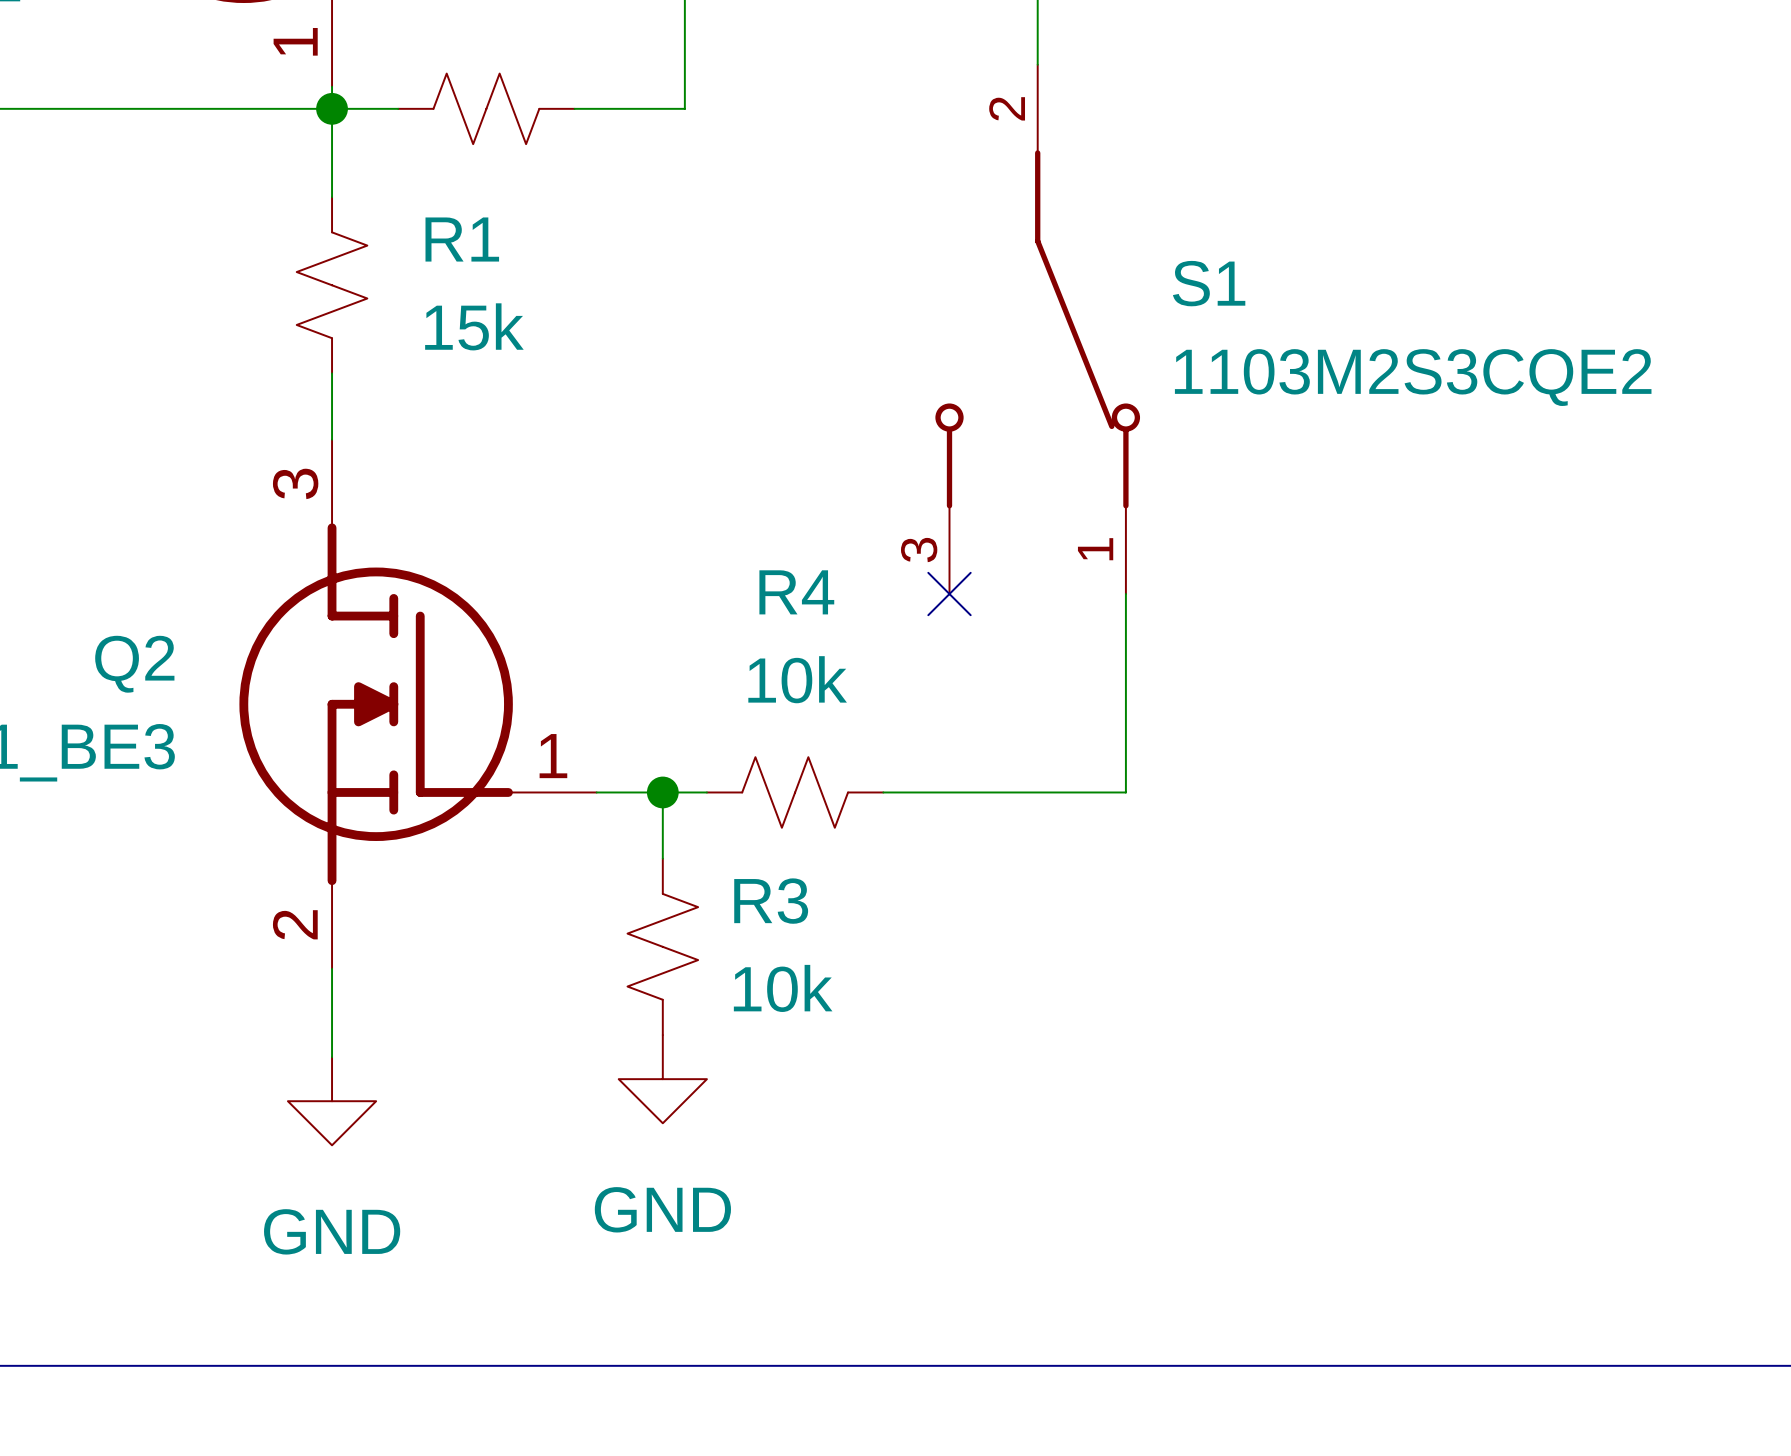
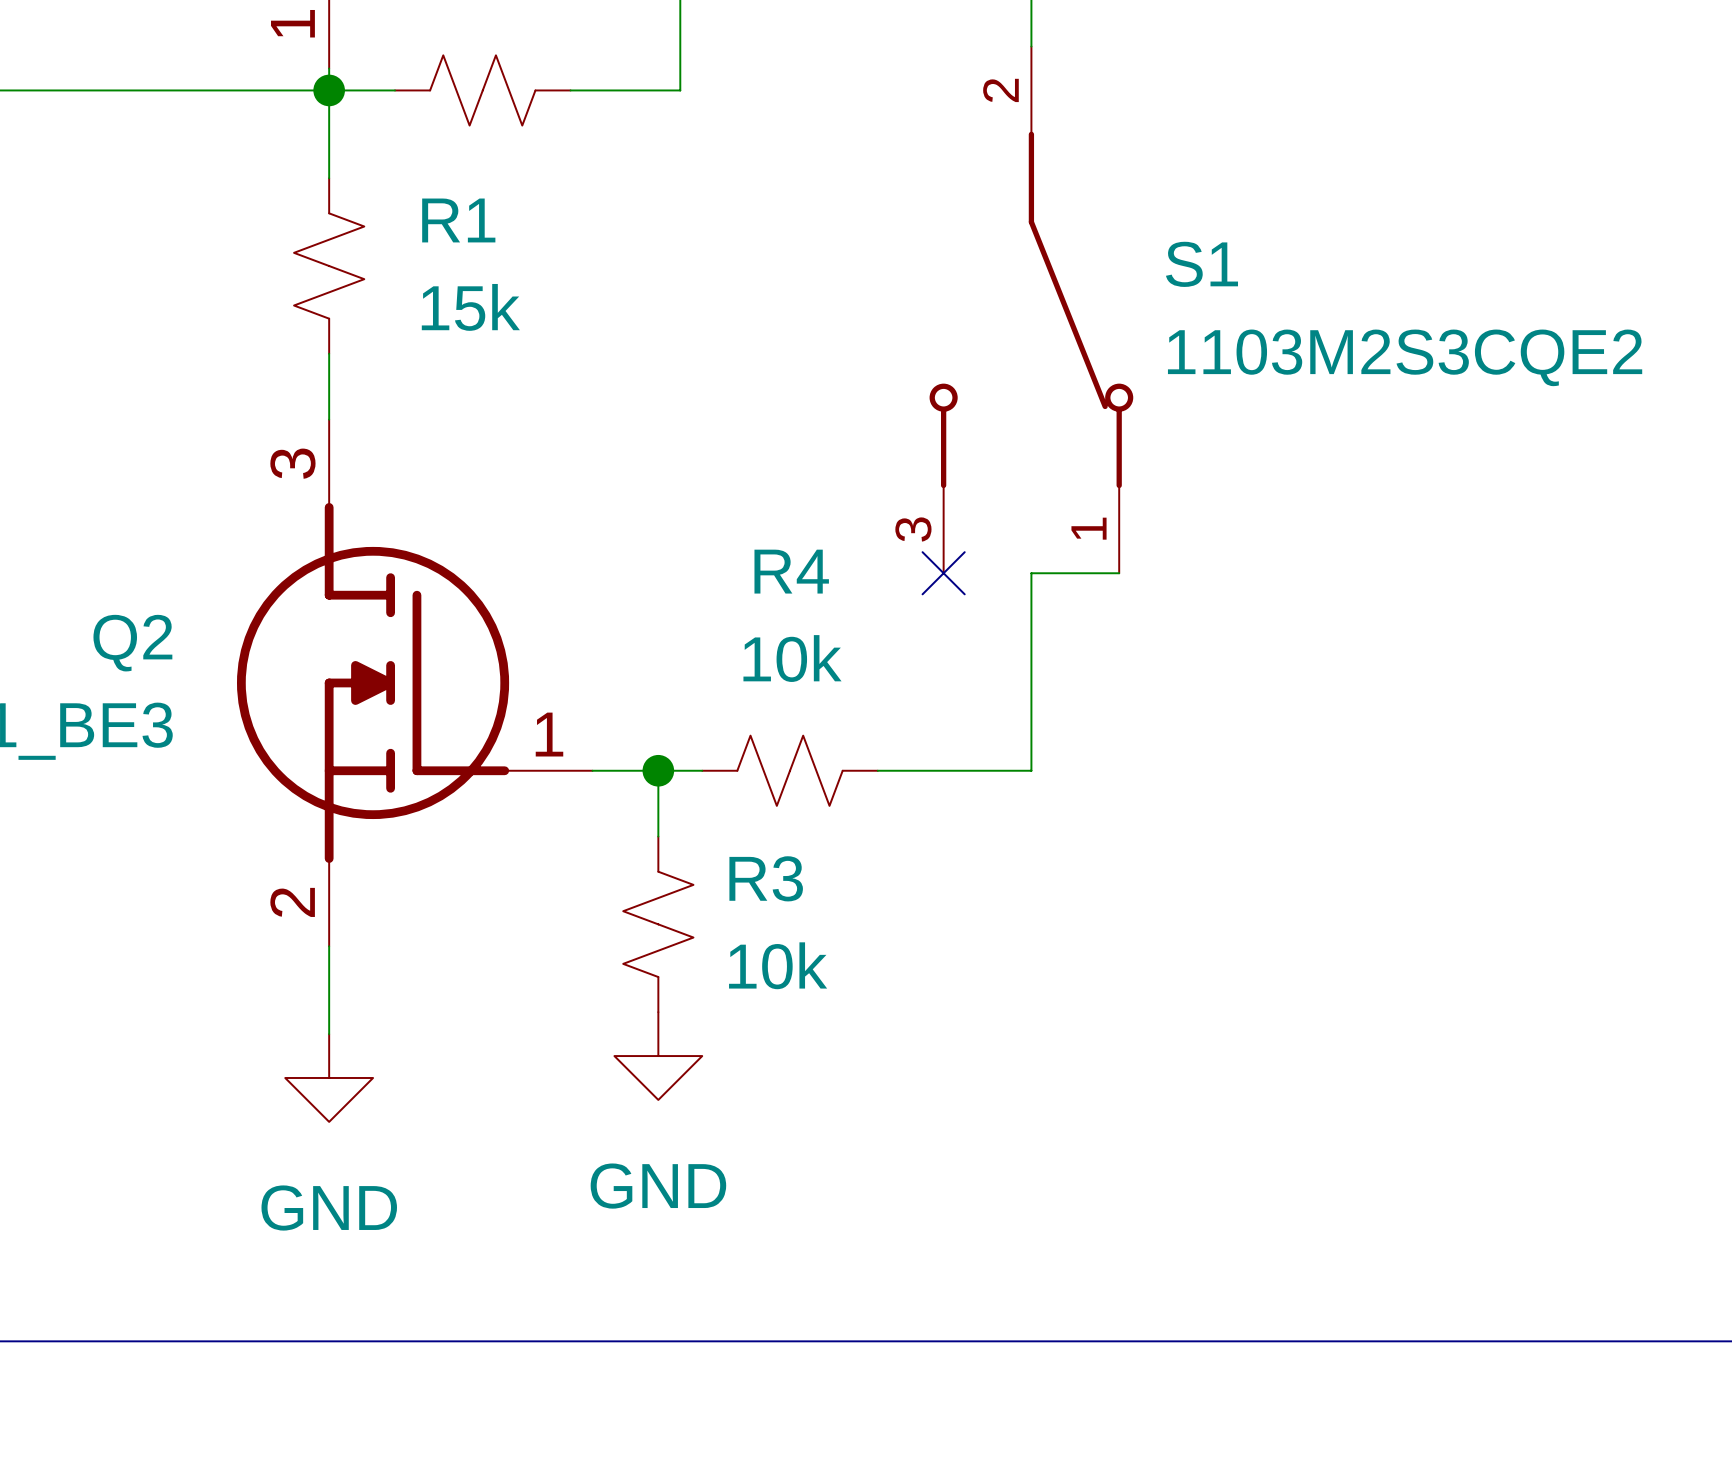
wire: (1125, 594) (1125, 792) (1037, 792) -> (1119, 573) (1031, 573) (1031, 770)

